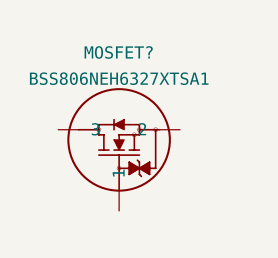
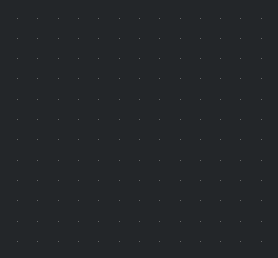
MOSFET?: BSS806NEH6327XTSA1 (119, 149) -> none

